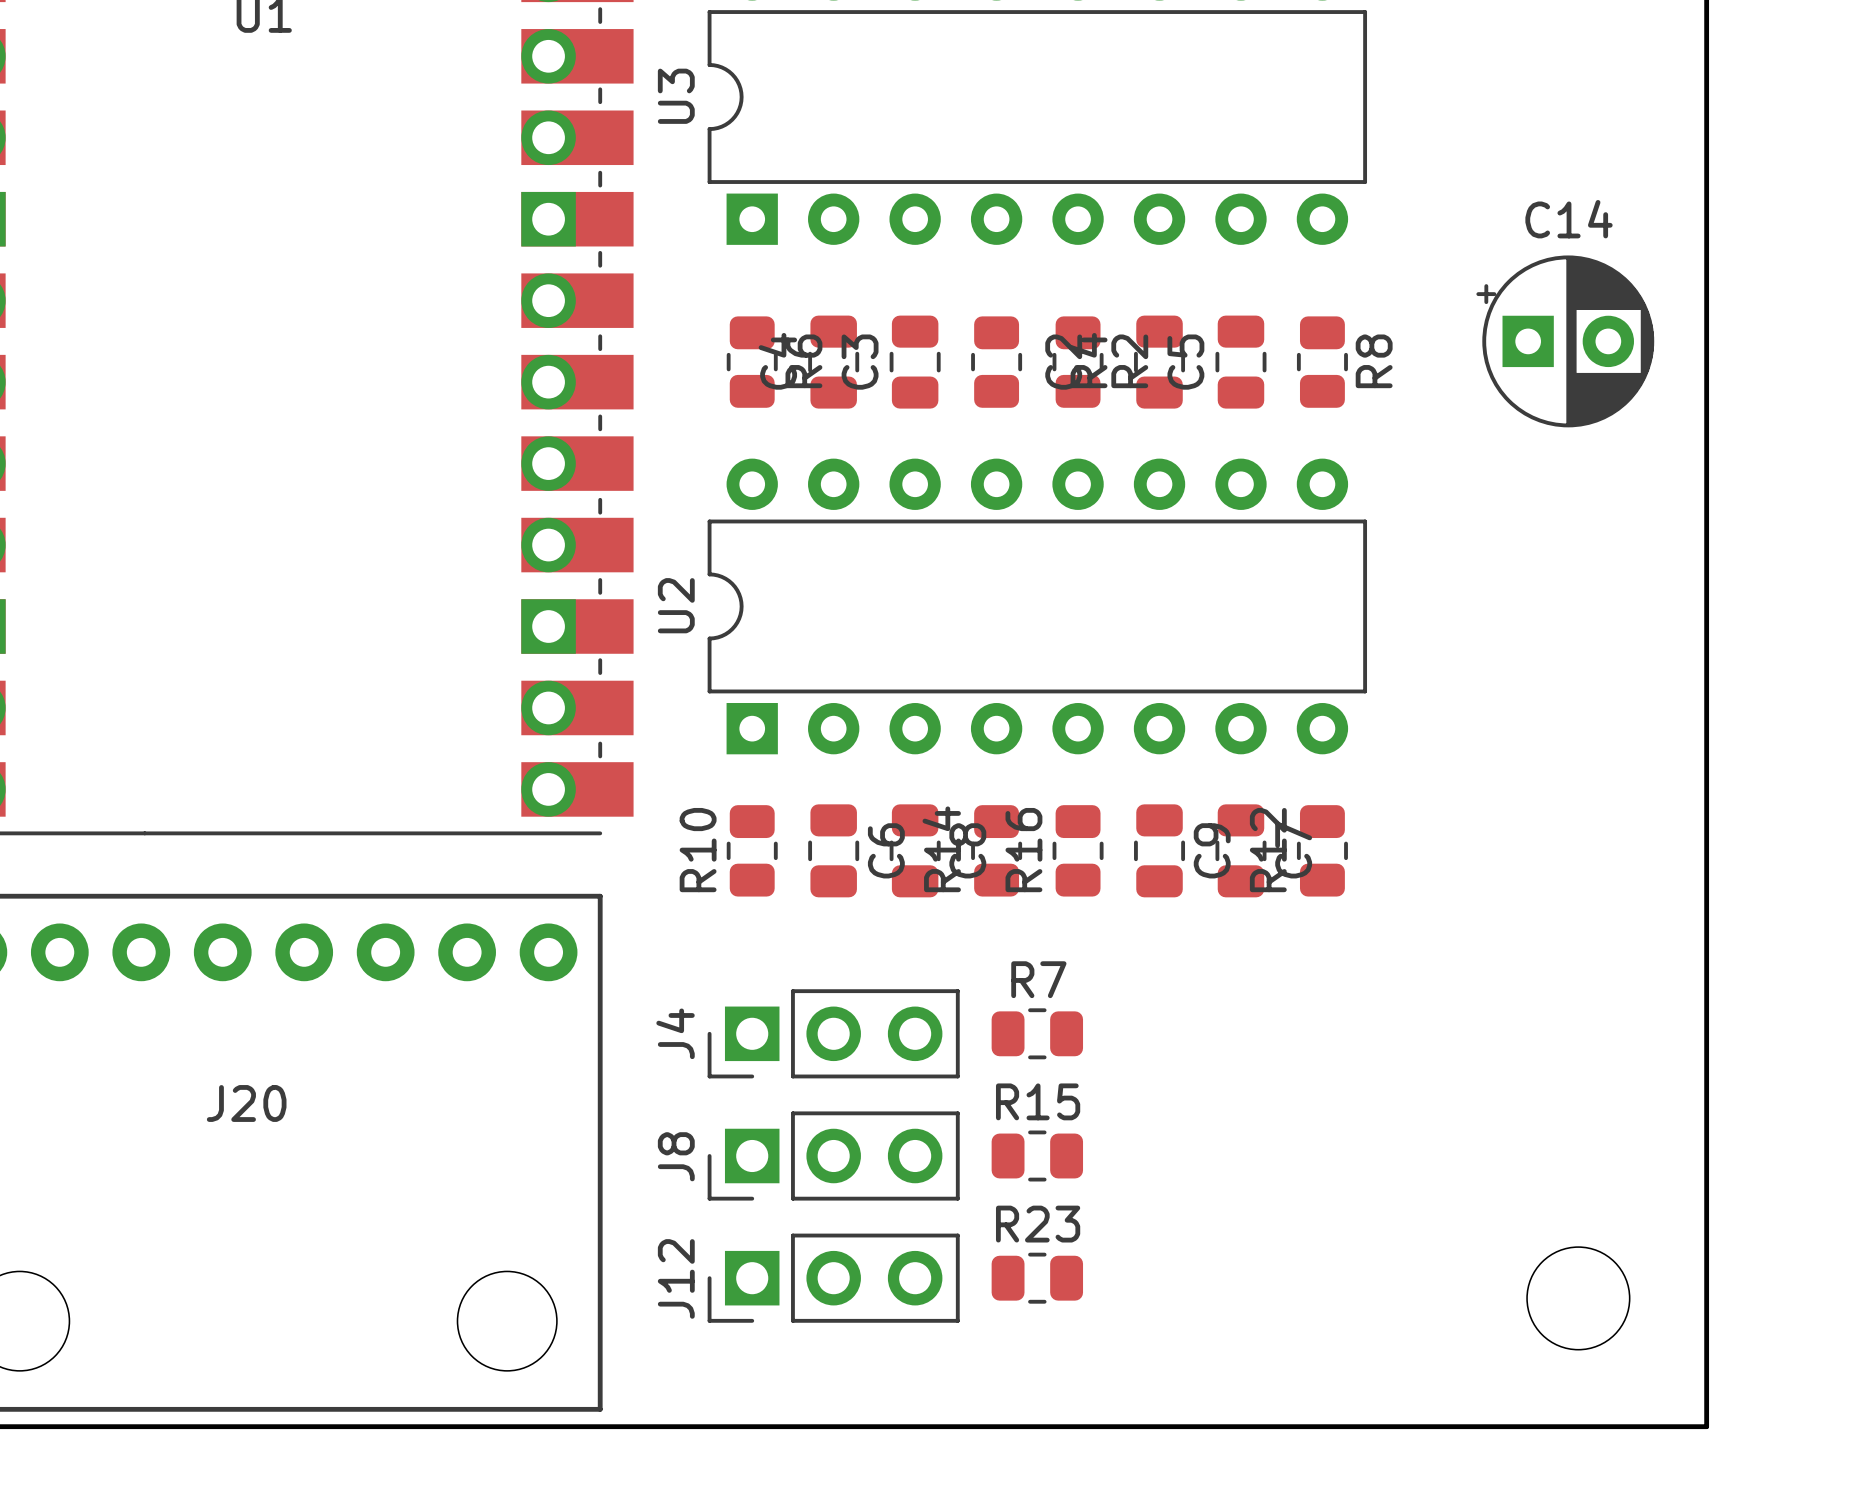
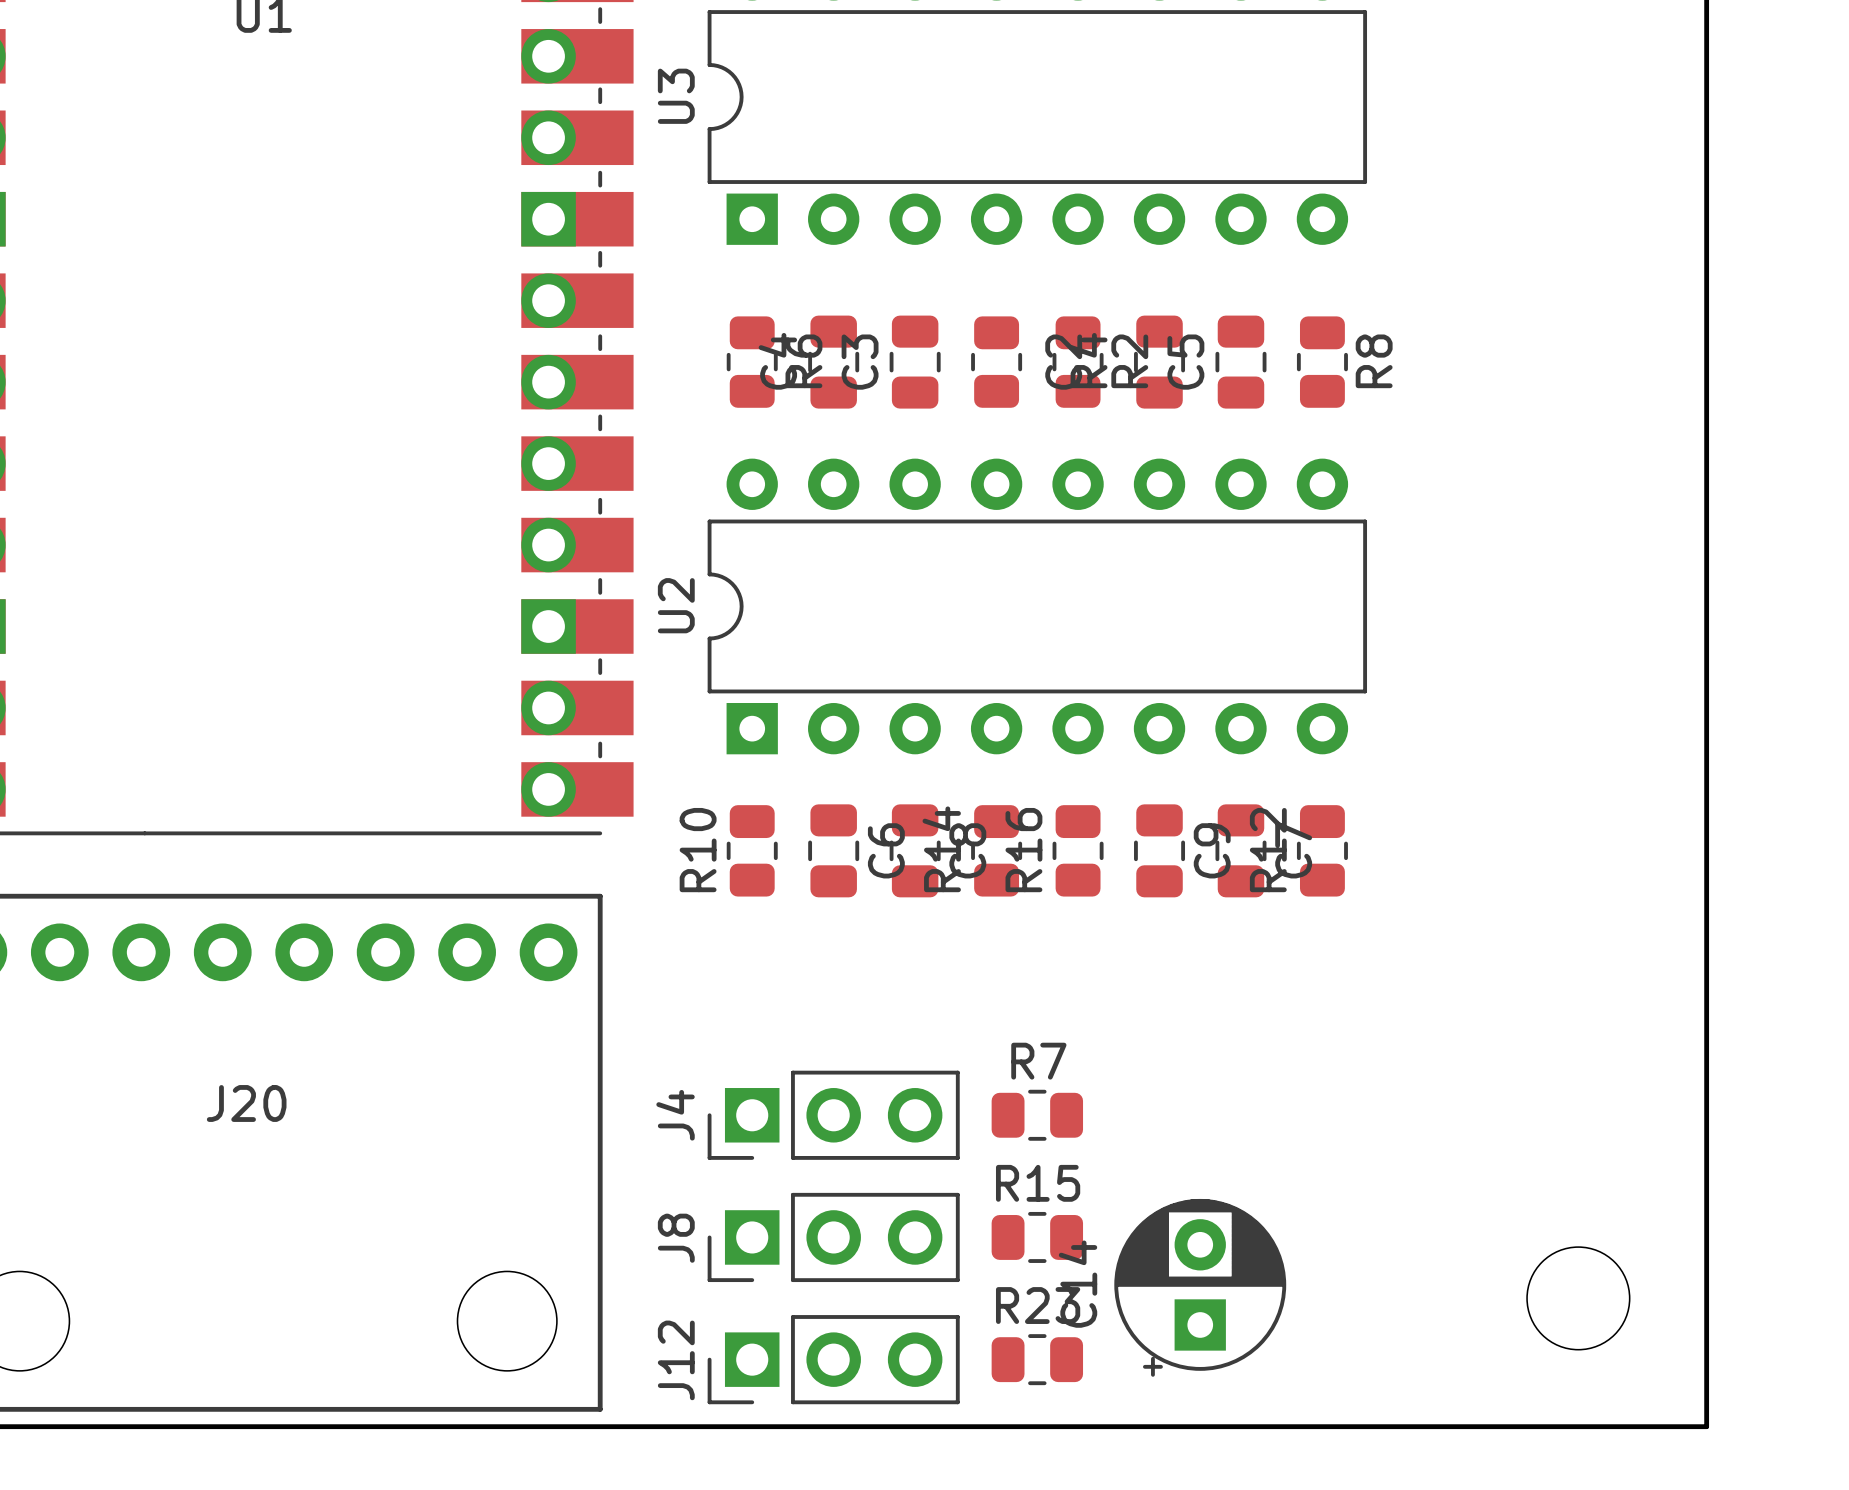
C14 rotation: 0° (1565, 341) -> 90° counterclockwise (1200, 1287)
C14 position: (1565, 341) -> (1200, 1287)
J4 position: (833, 1033) -> (833, 1115)
R7 position: (1037, 1033) -> (1037, 1115)
J8 position: (833, 1156) -> (833, 1237)
R15 position: (1037, 1156) -> (1037, 1237)
J12 position: (833, 1278) -> (833, 1359)
R23 position: (1037, 1278) -> (1037, 1359)

